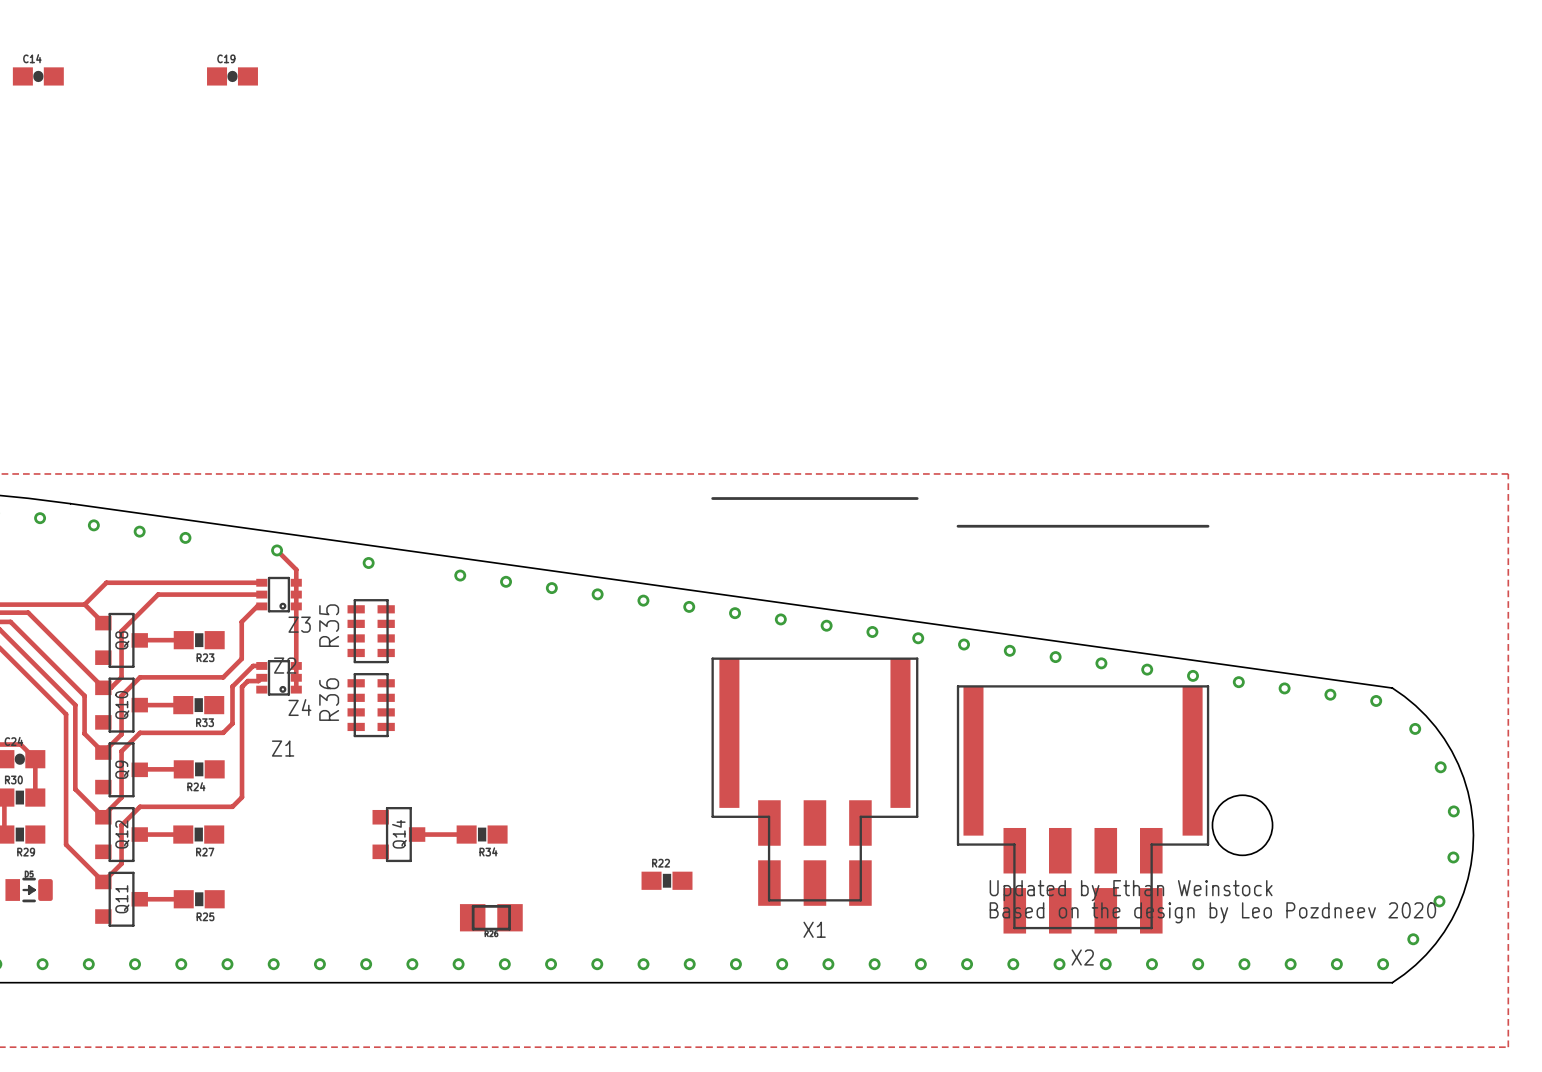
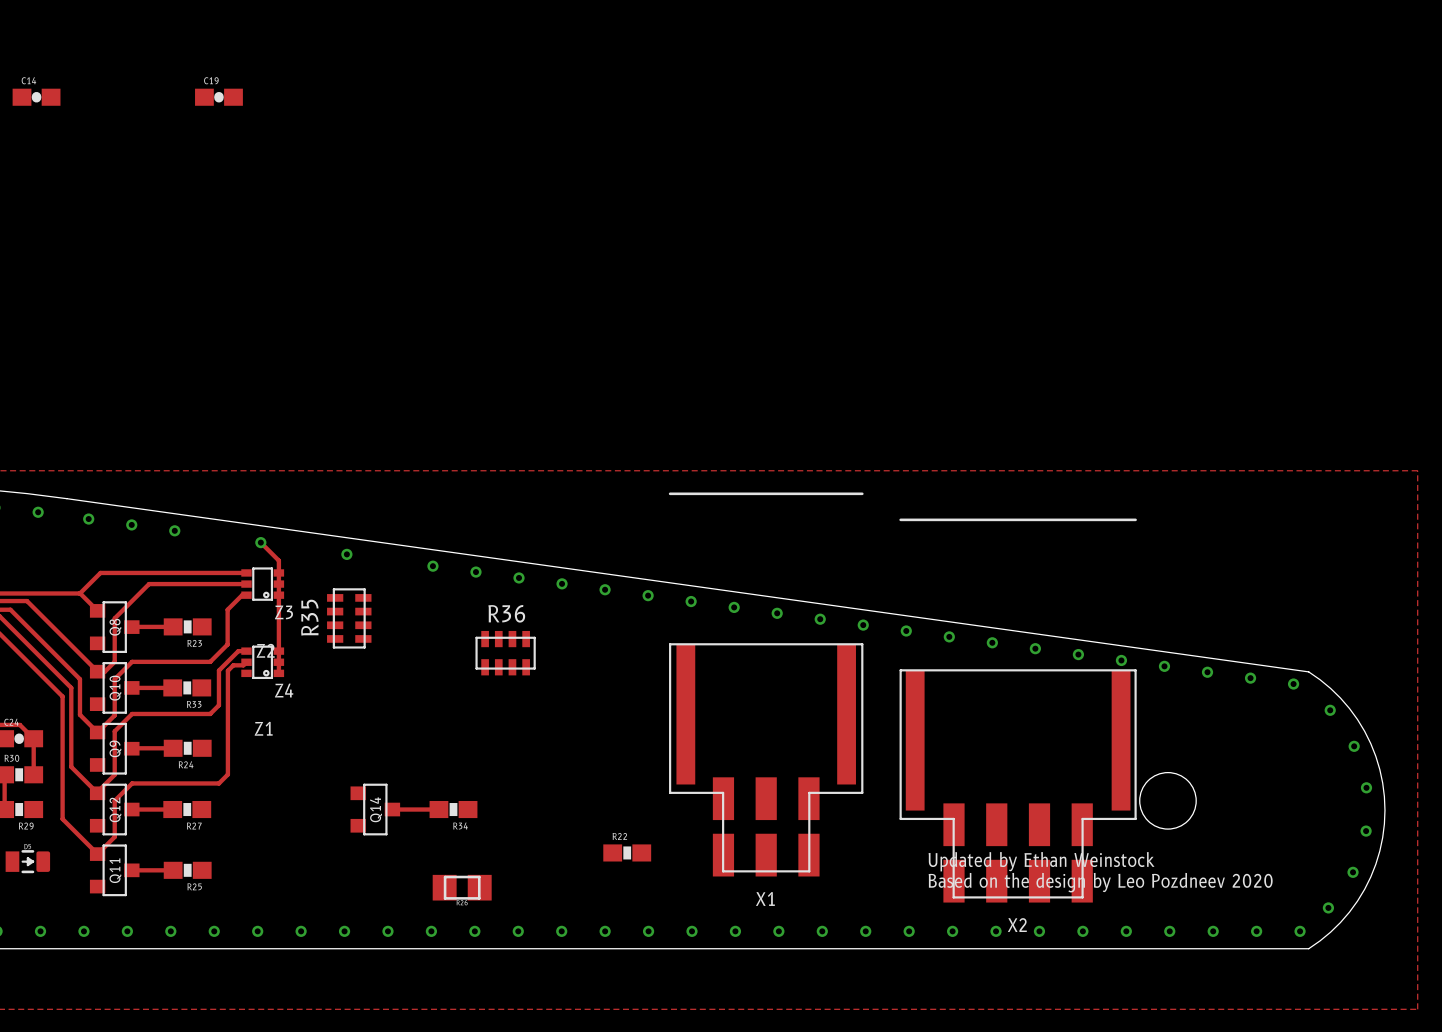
R36 rotation: 0° (371, 705) -> 90° clockwise (505, 653)
R36 position: (371, 705) -> (505, 653)

